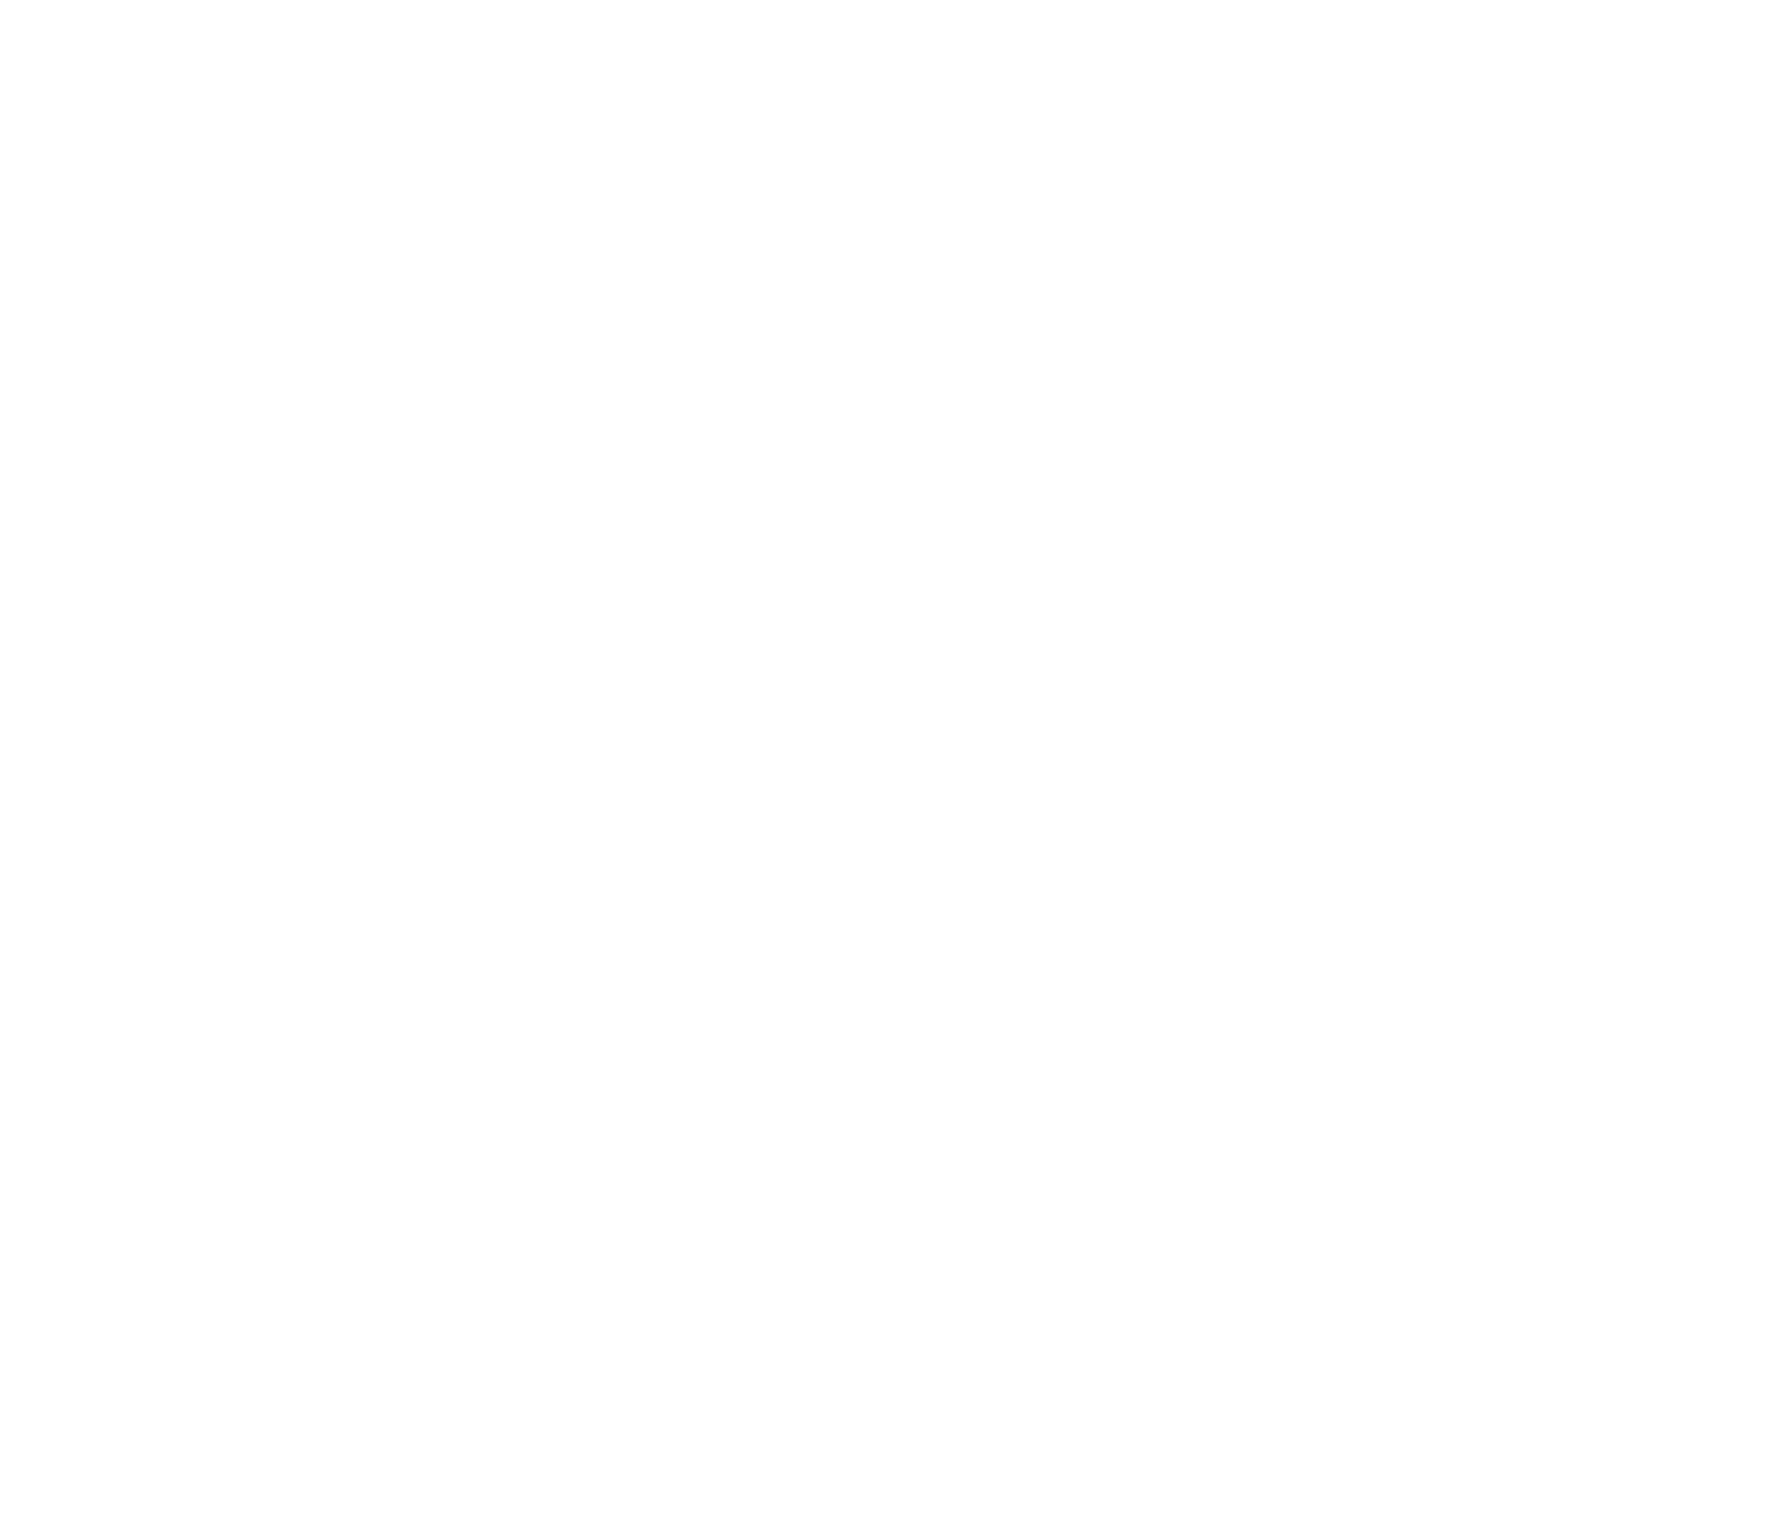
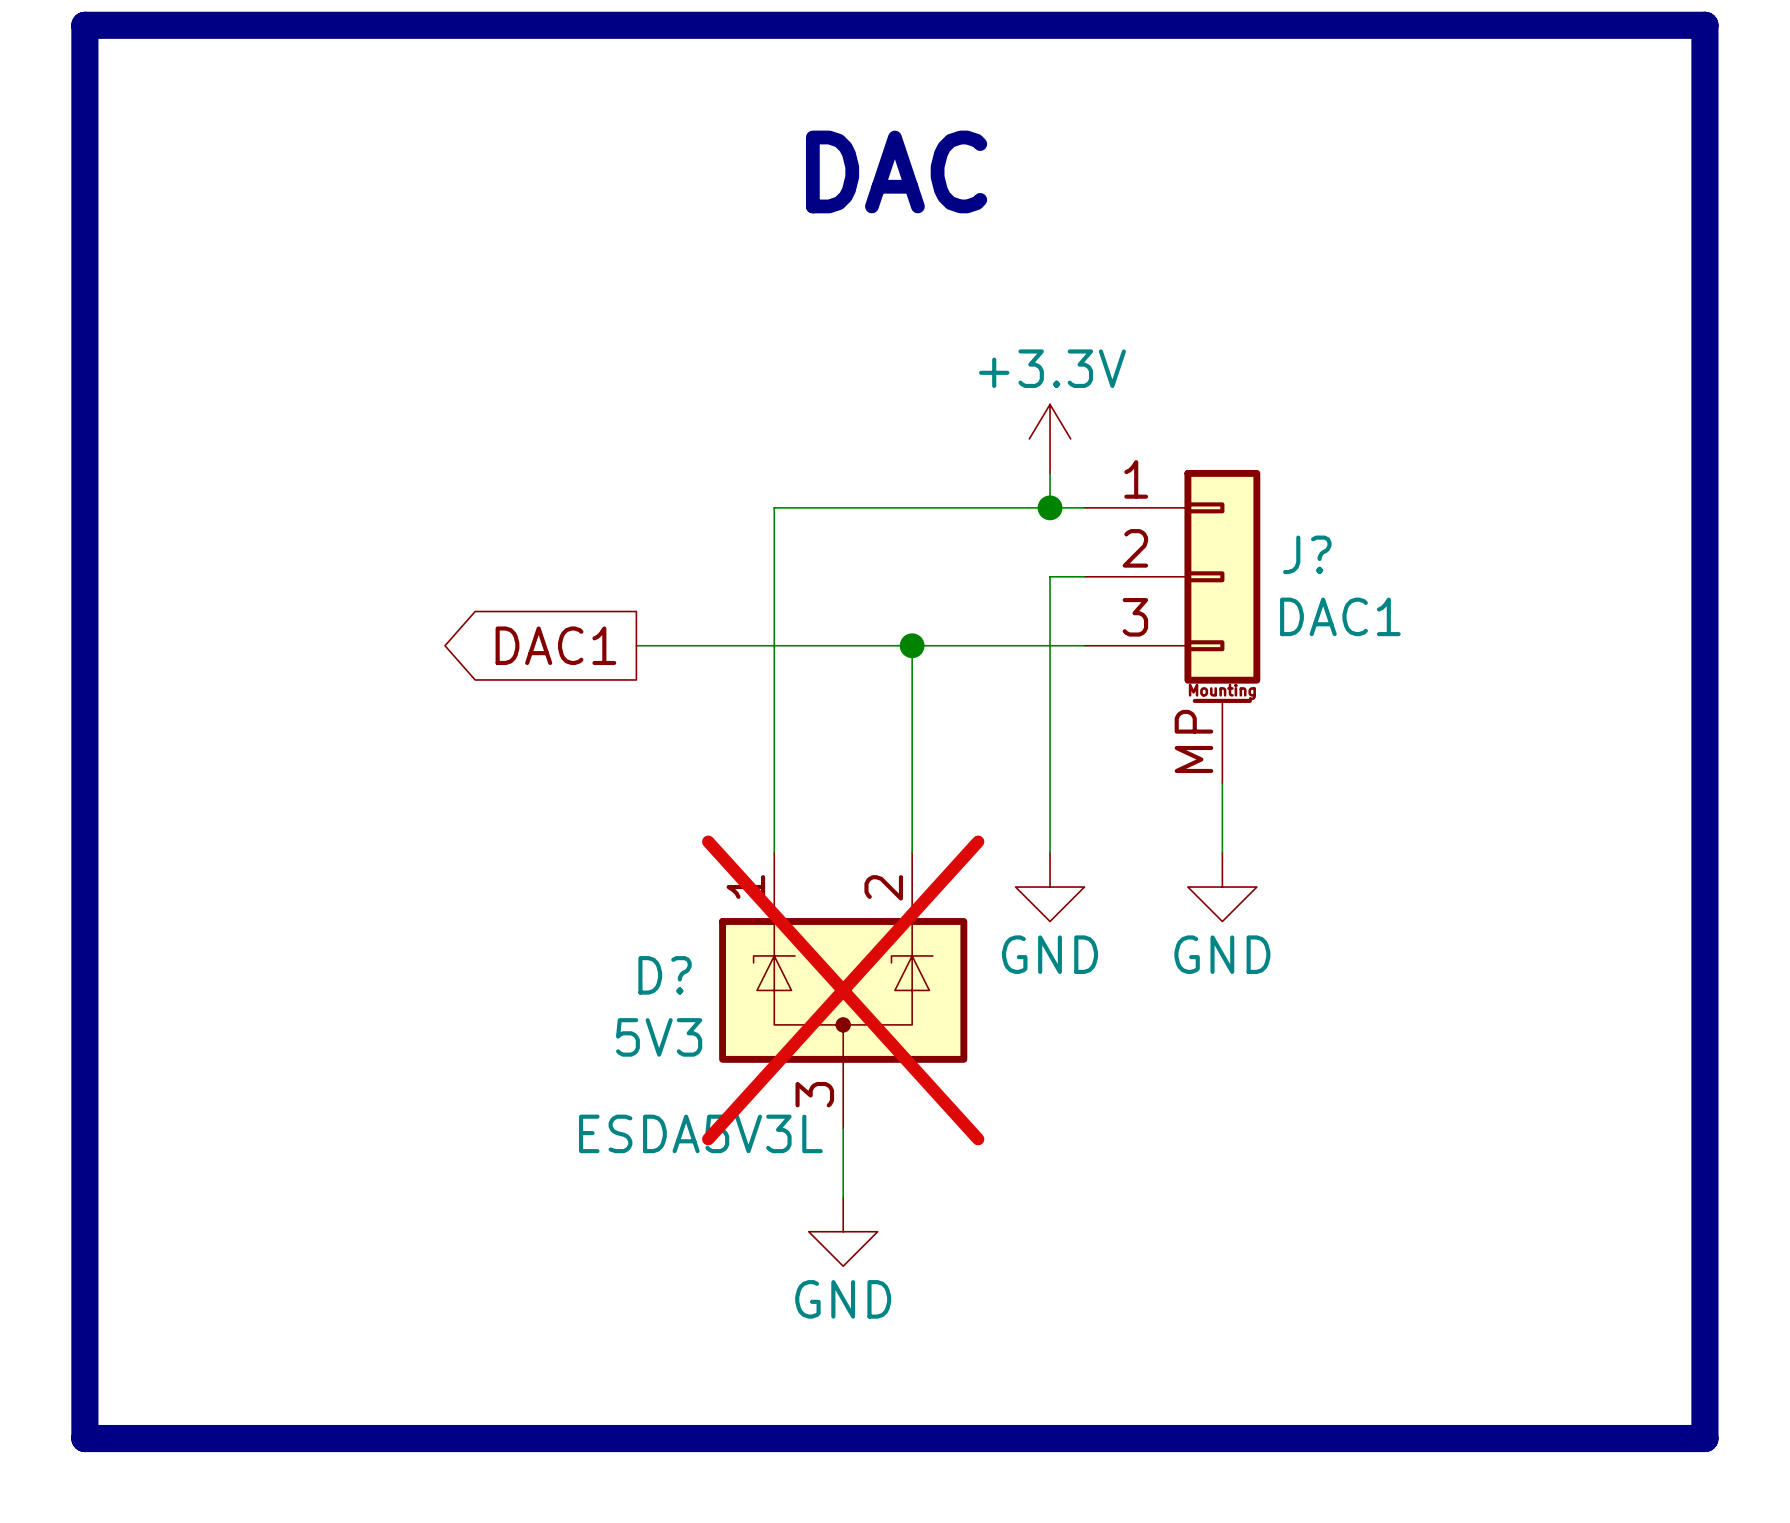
line: none -> (84, 25) (1704, 25) (1704, 1438) (84, 1438) (84, 25)
text: none -> DAC (896, 171)
power symbol: none -> +3.3V (1050, 438)
wire: none -> (1050, 473) (1050, 507)
junction: none -> (1050, 507)
wire: none -> (1084, 507) (774, 507) (774, 852)
wire: none -> (1084, 576) (1050, 576) (1050, 852)
J?: none -> (1172, 626)
global label: none -> DAC1 (555, 645)
wire: none -> (636, 645) (1084, 645)
wire: none -> (912, 645) (912, 852)
junction: none -> (912, 645)
wire: none -> (1222, 783) (1222, 852)
power symbol: none -> GND (1050, 887)
power symbol: none -> GND (1222, 887)
D?: none -> 5V3 (843, 990)
wire: none -> (843, 1128) (843, 1197)
power symbol: none -> GND (843, 1231)

